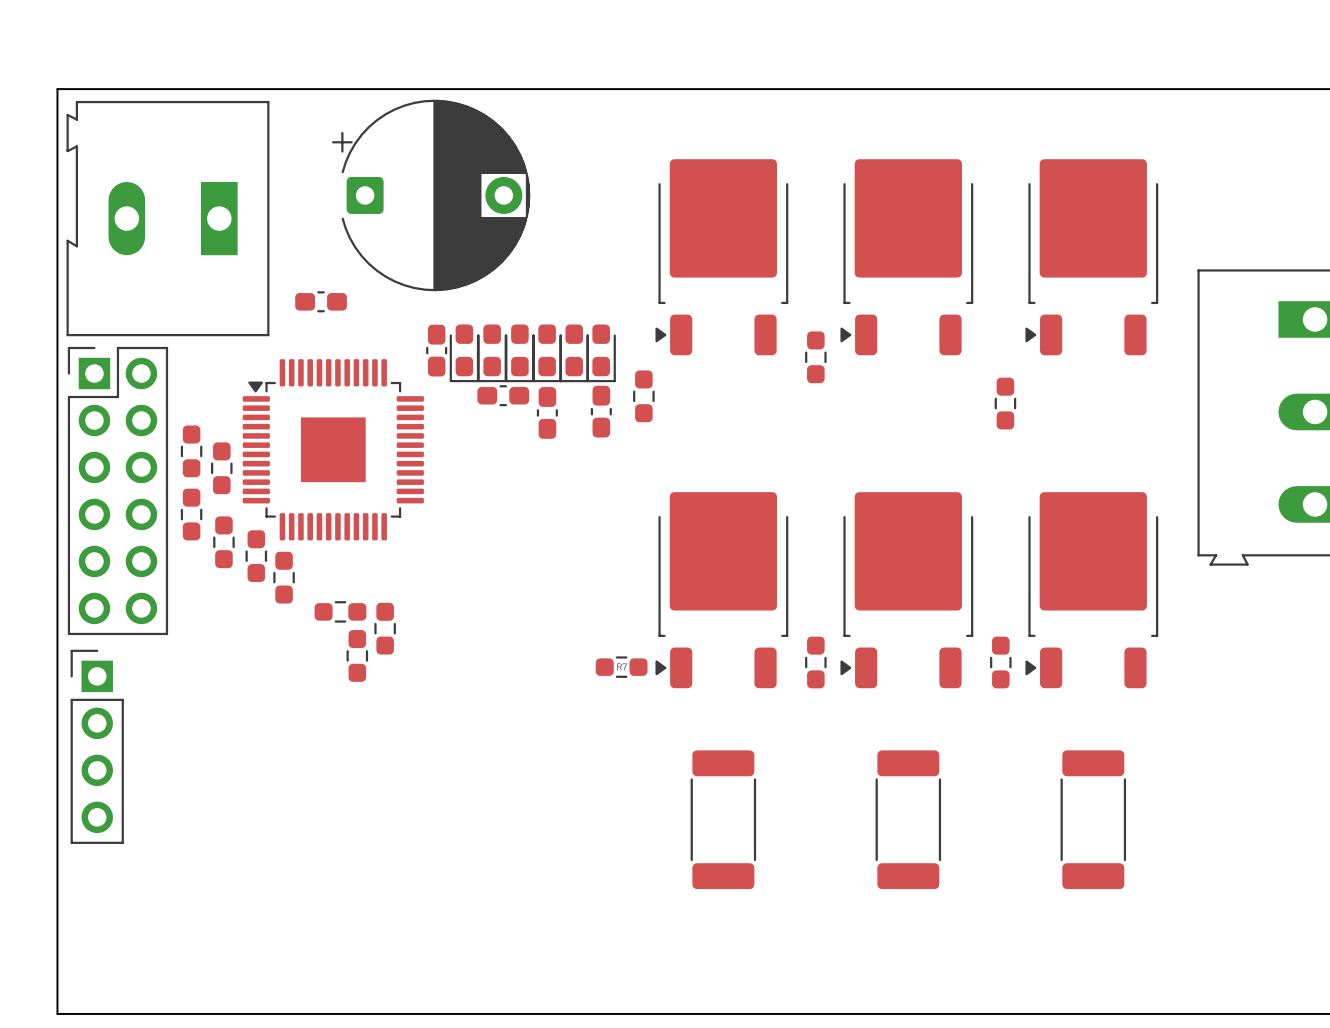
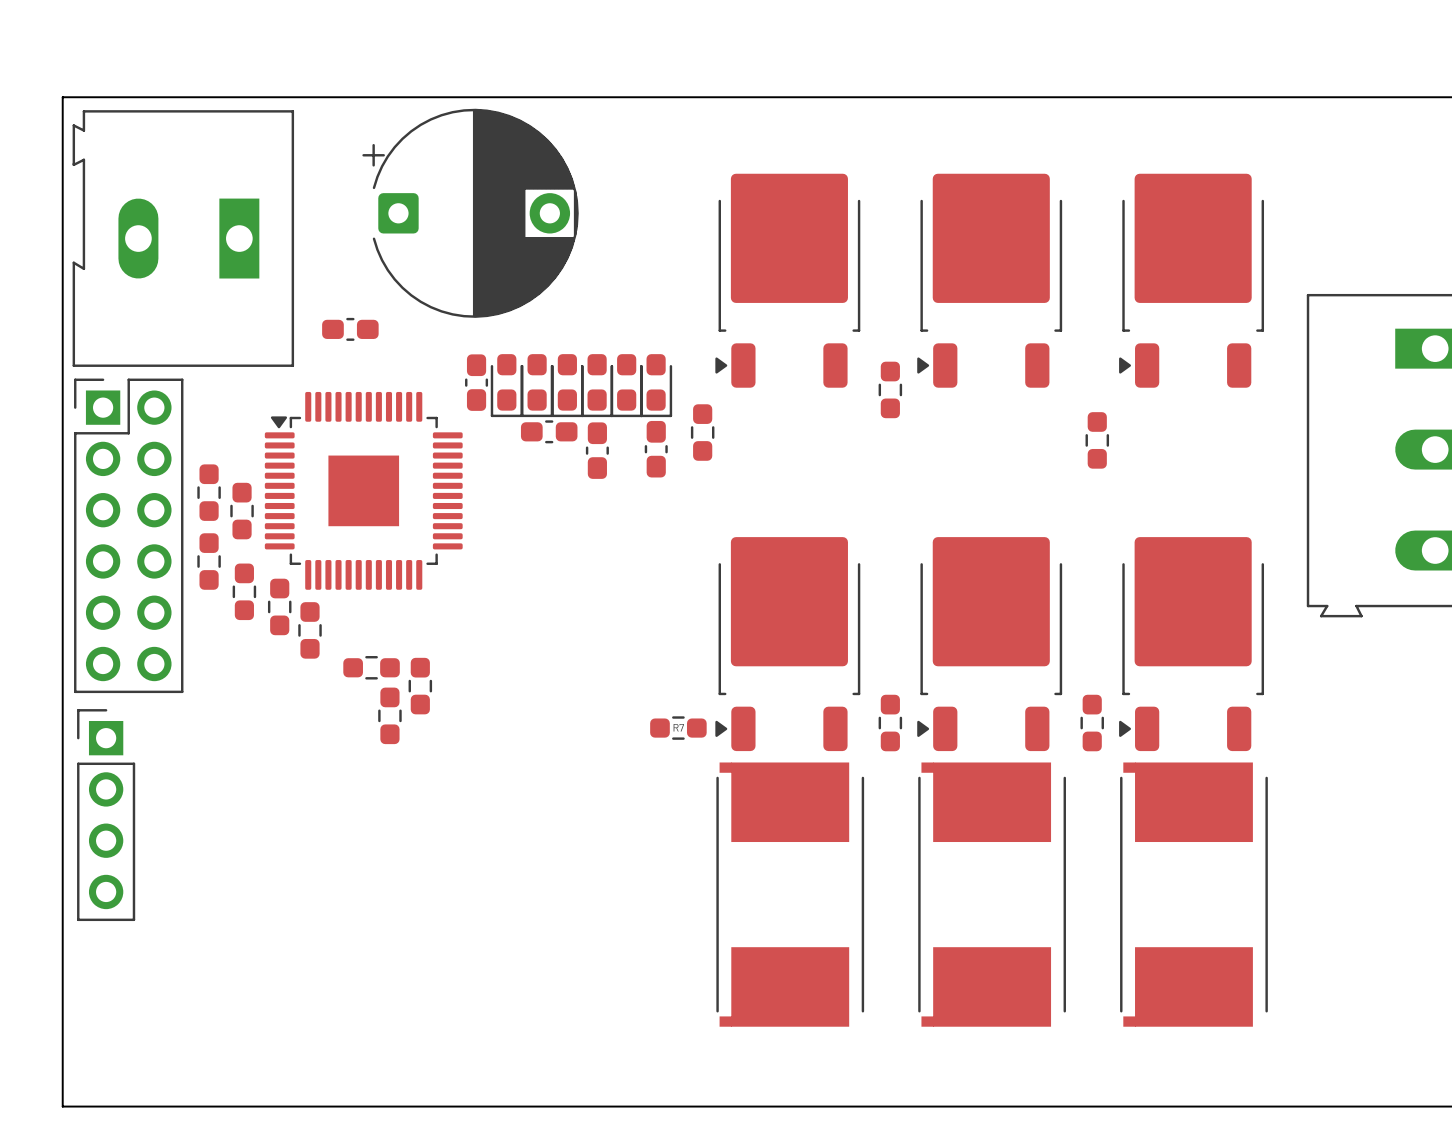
part footprint: [690, 750, 757, 890] -> [716, 762, 865, 1027]
part footprint: [875, 750, 942, 890] -> [918, 762, 1066, 1027]
part footprint: [1060, 750, 1127, 890] -> [1120, 762, 1268, 1027]

